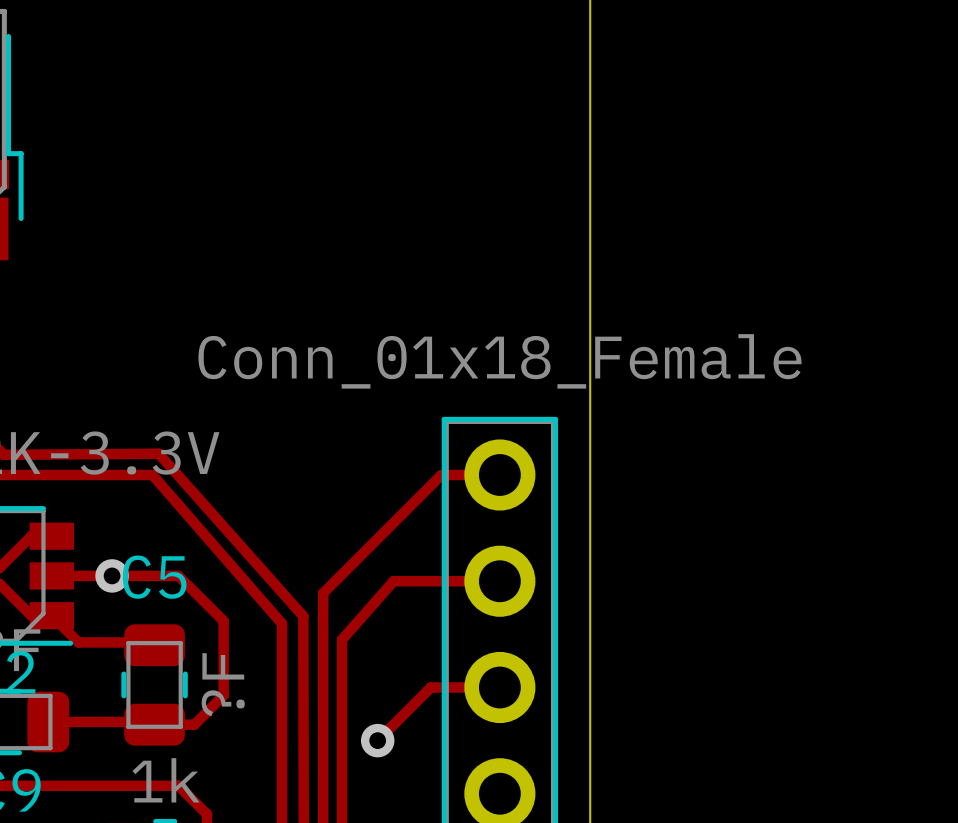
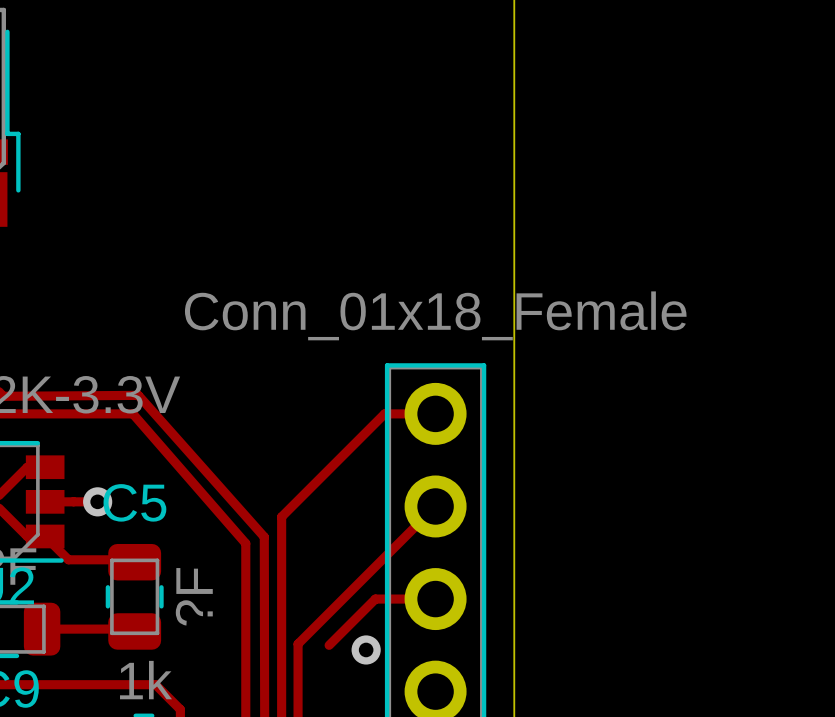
track: (112, 575) (178, 575) (223, 621) (223, 695) (194, 724) (154, 724) -> none
track: (499, 581) (393, 581) (342, 639) (342, 739) -> (435, 506) (298, 644)
via position: (377, 740) -> (366, 649)

